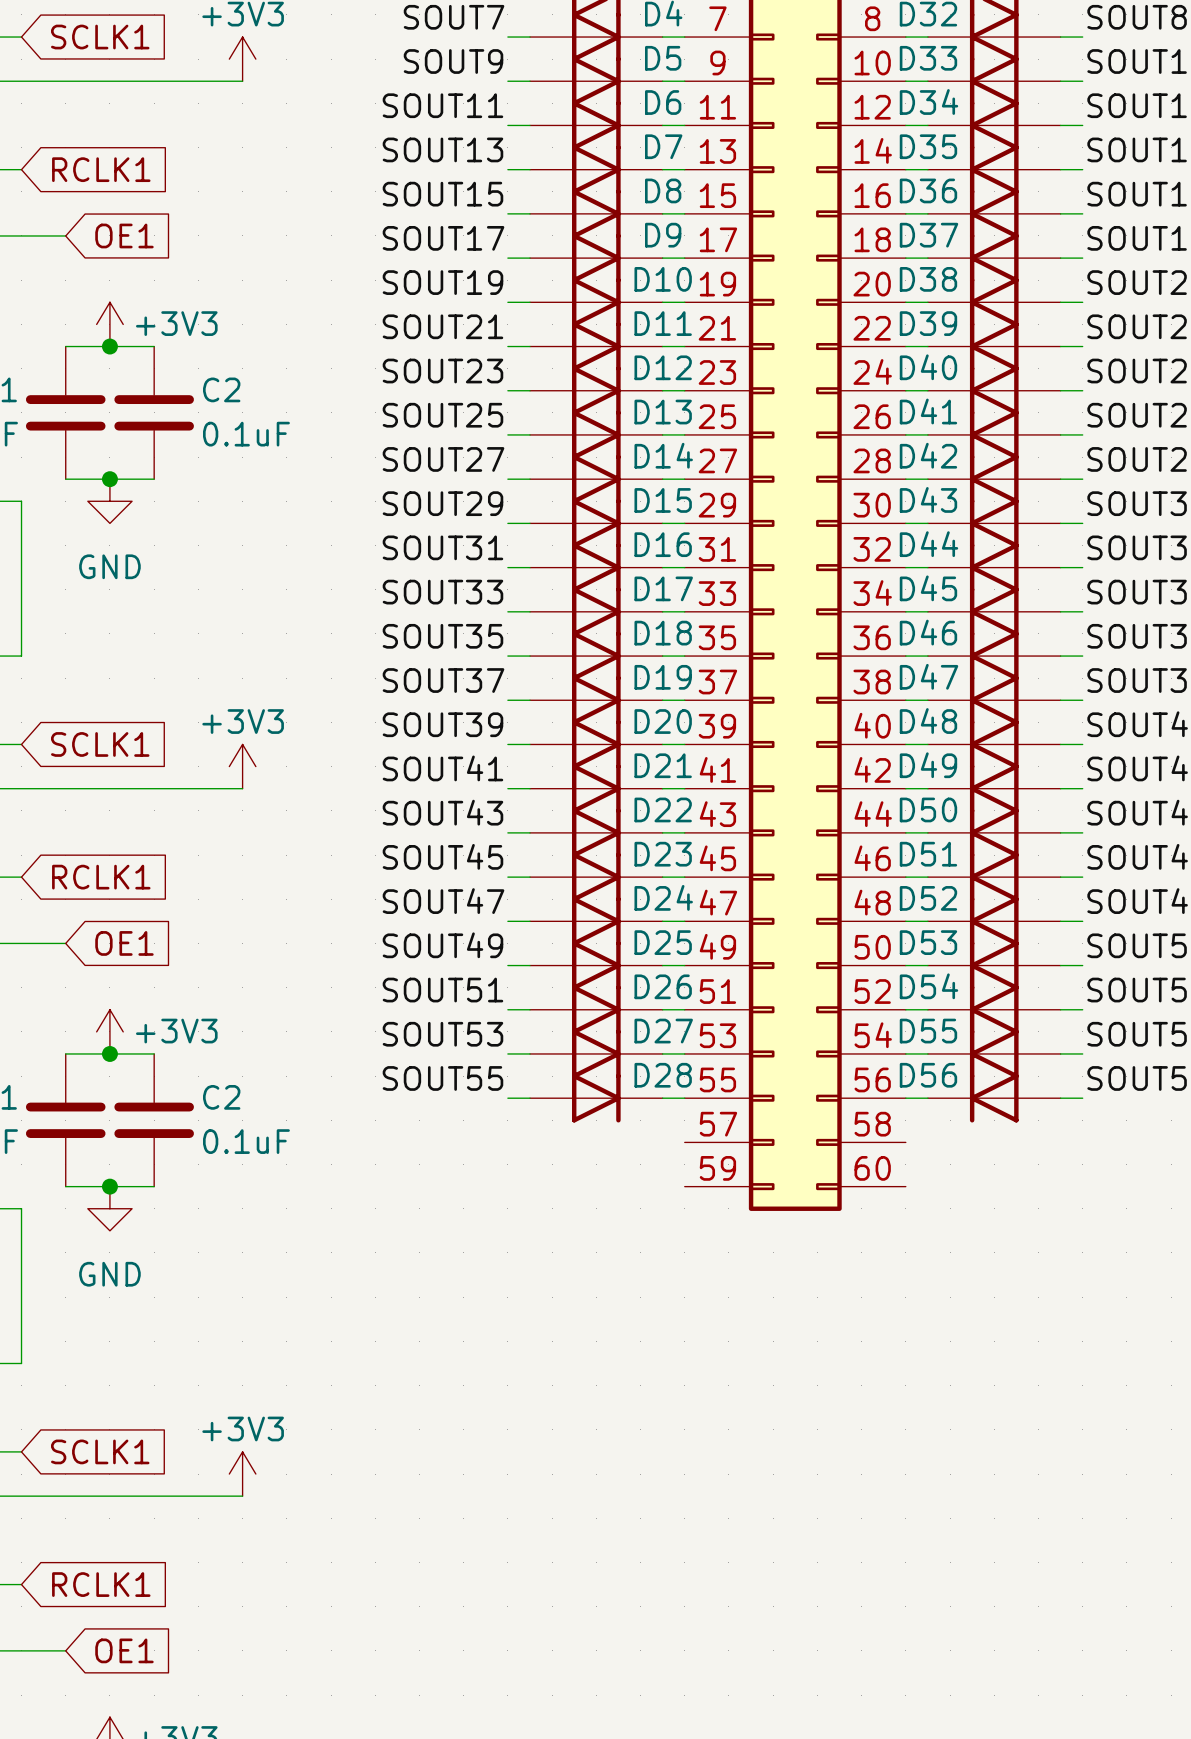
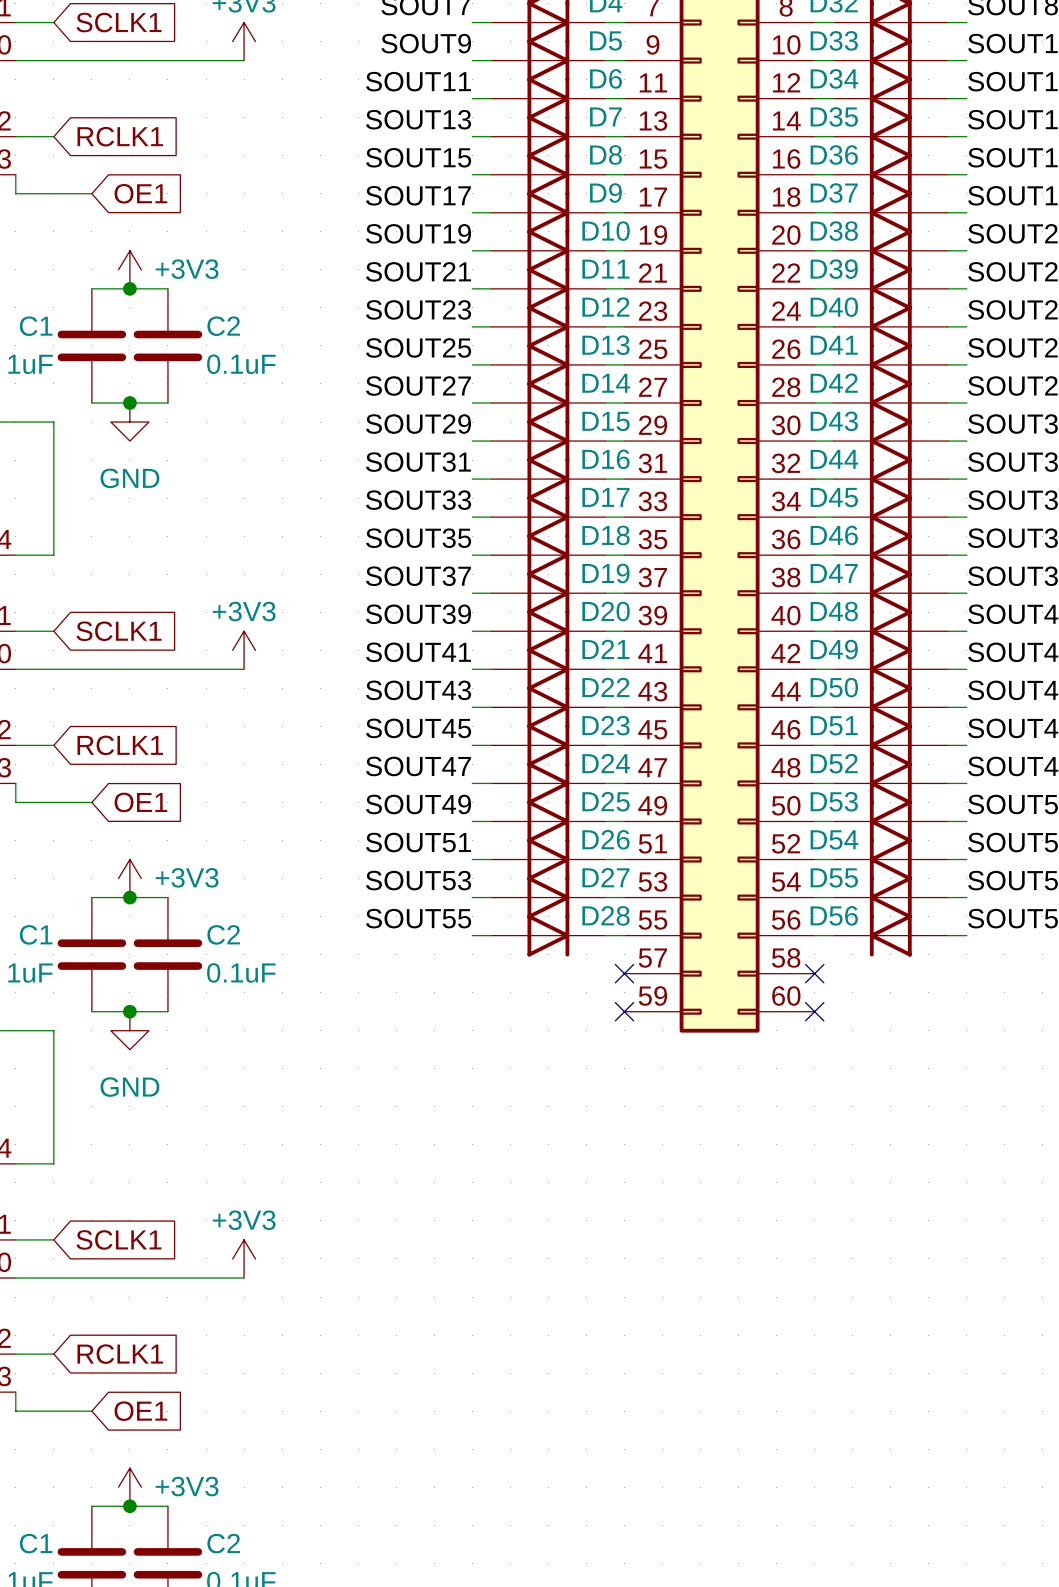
no-connect mark: none -> (624, 973)
no-connect mark: none -> (814, 973)
no-connect mark: none -> (624, 1011)
no-connect mark: none -> (814, 1011)

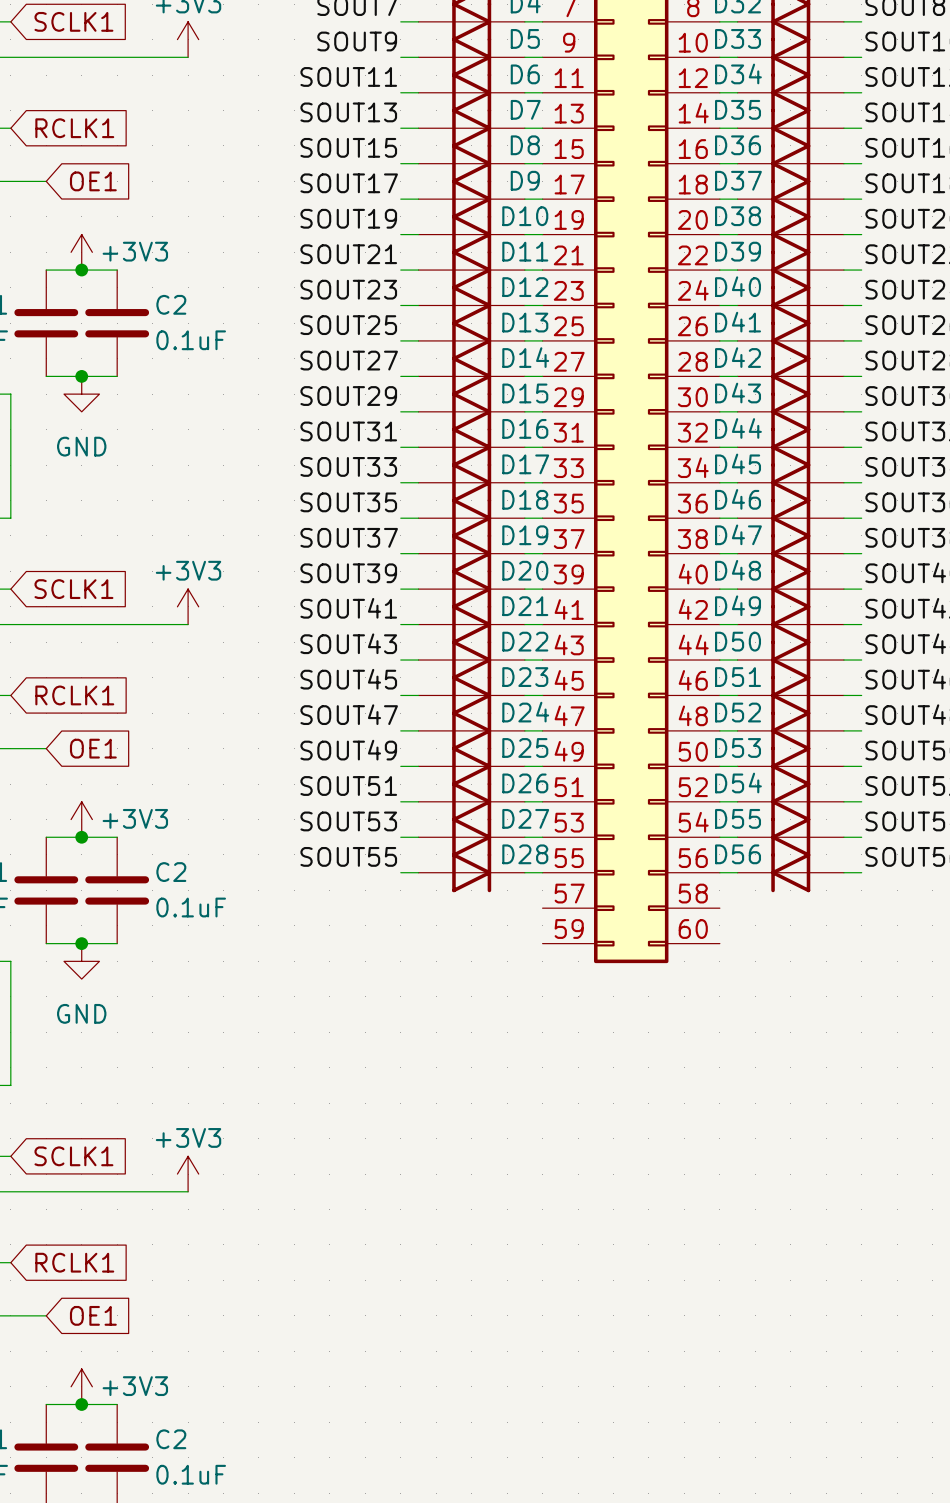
no-connect mark: (624, 973) -> none
no-connect mark: (814, 973) -> none
no-connect mark: (624, 1011) -> none
no-connect mark: (814, 1011) -> none

